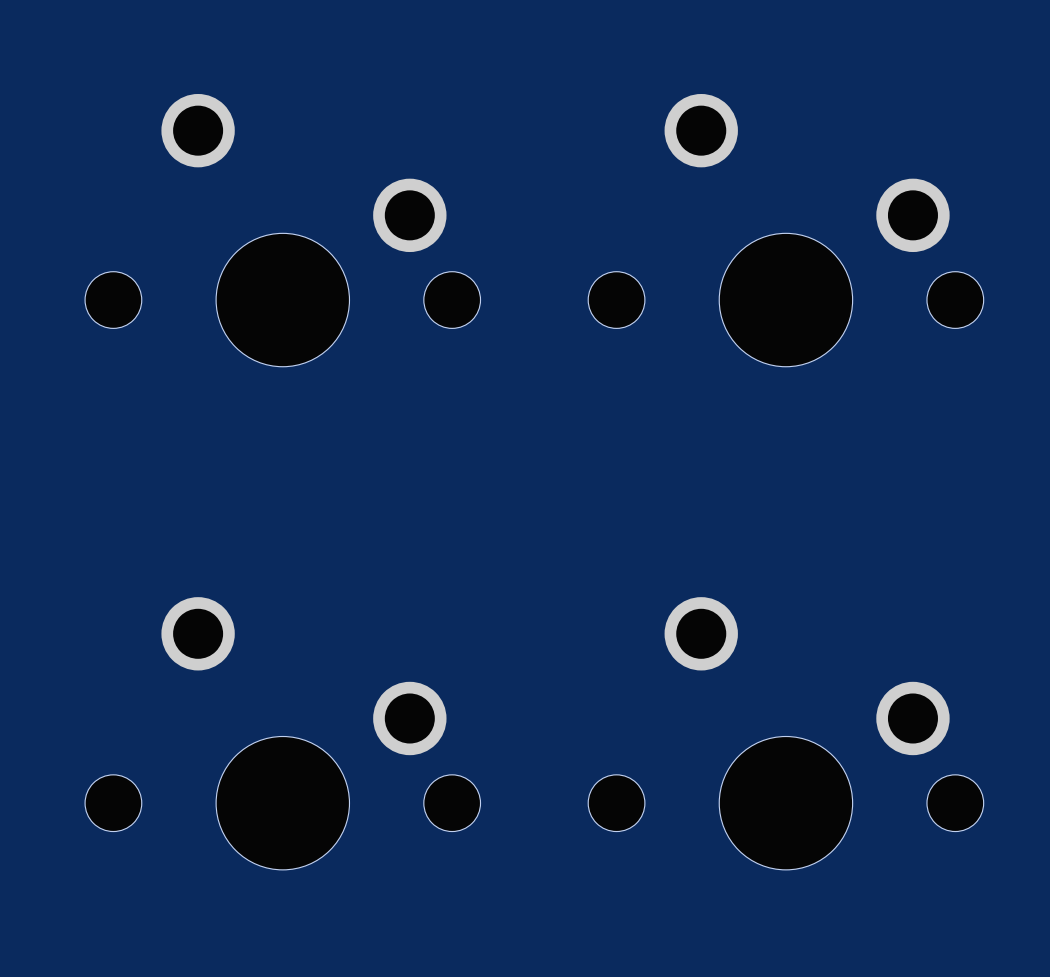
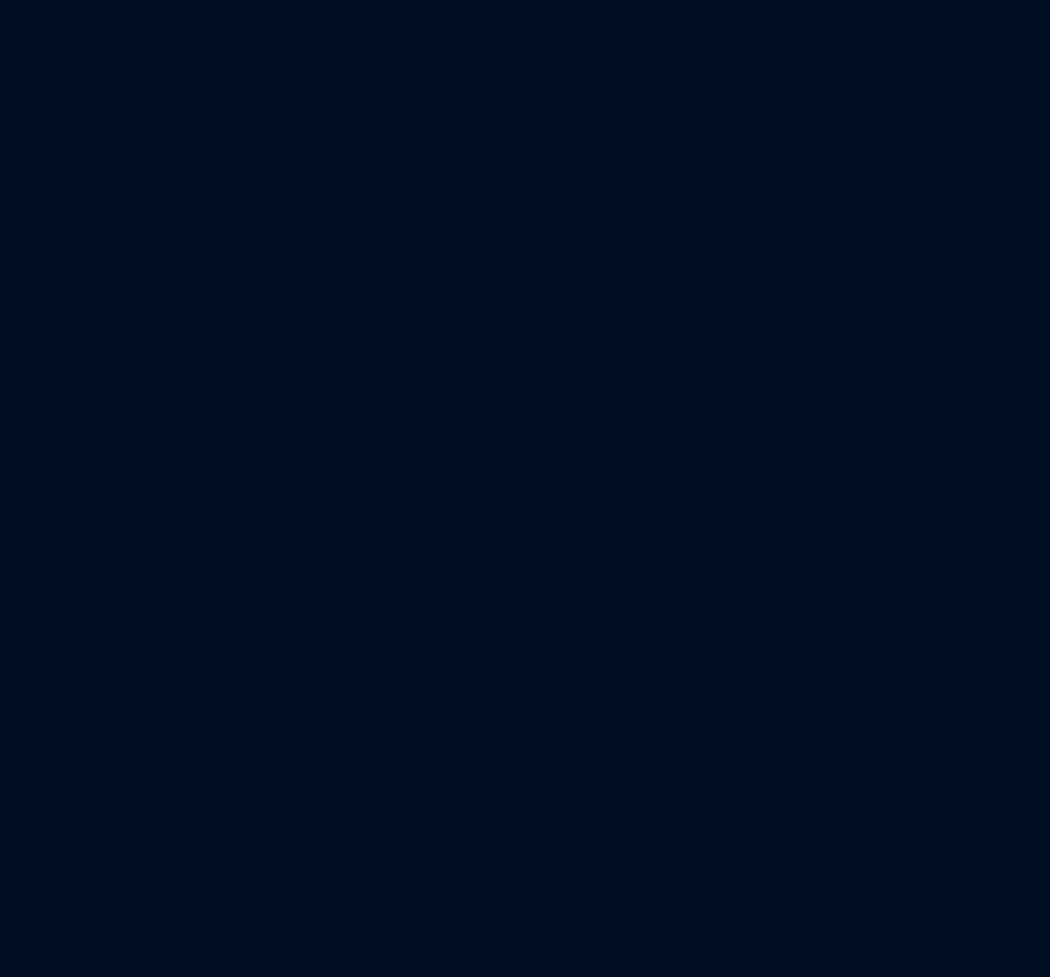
part: (282, 230) -> none
part: (785, 230) -> none
part: (282, 733) -> none
part: (785, 733) -> none

